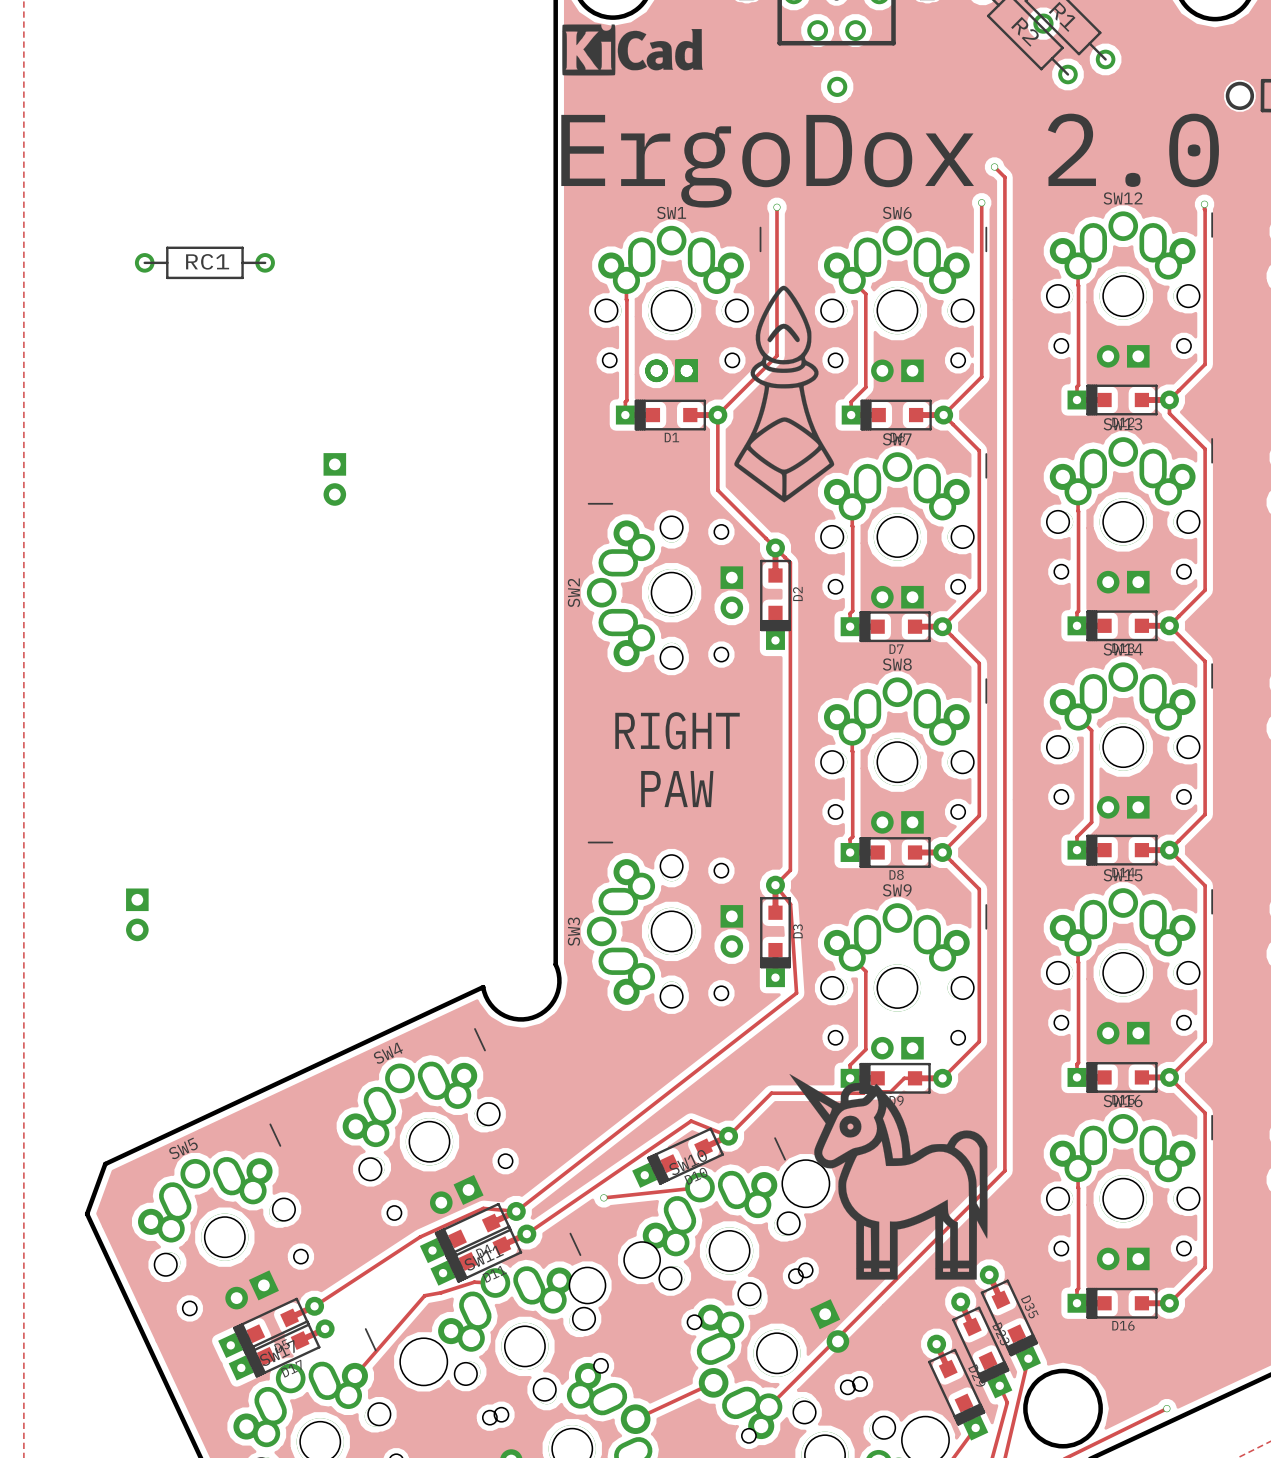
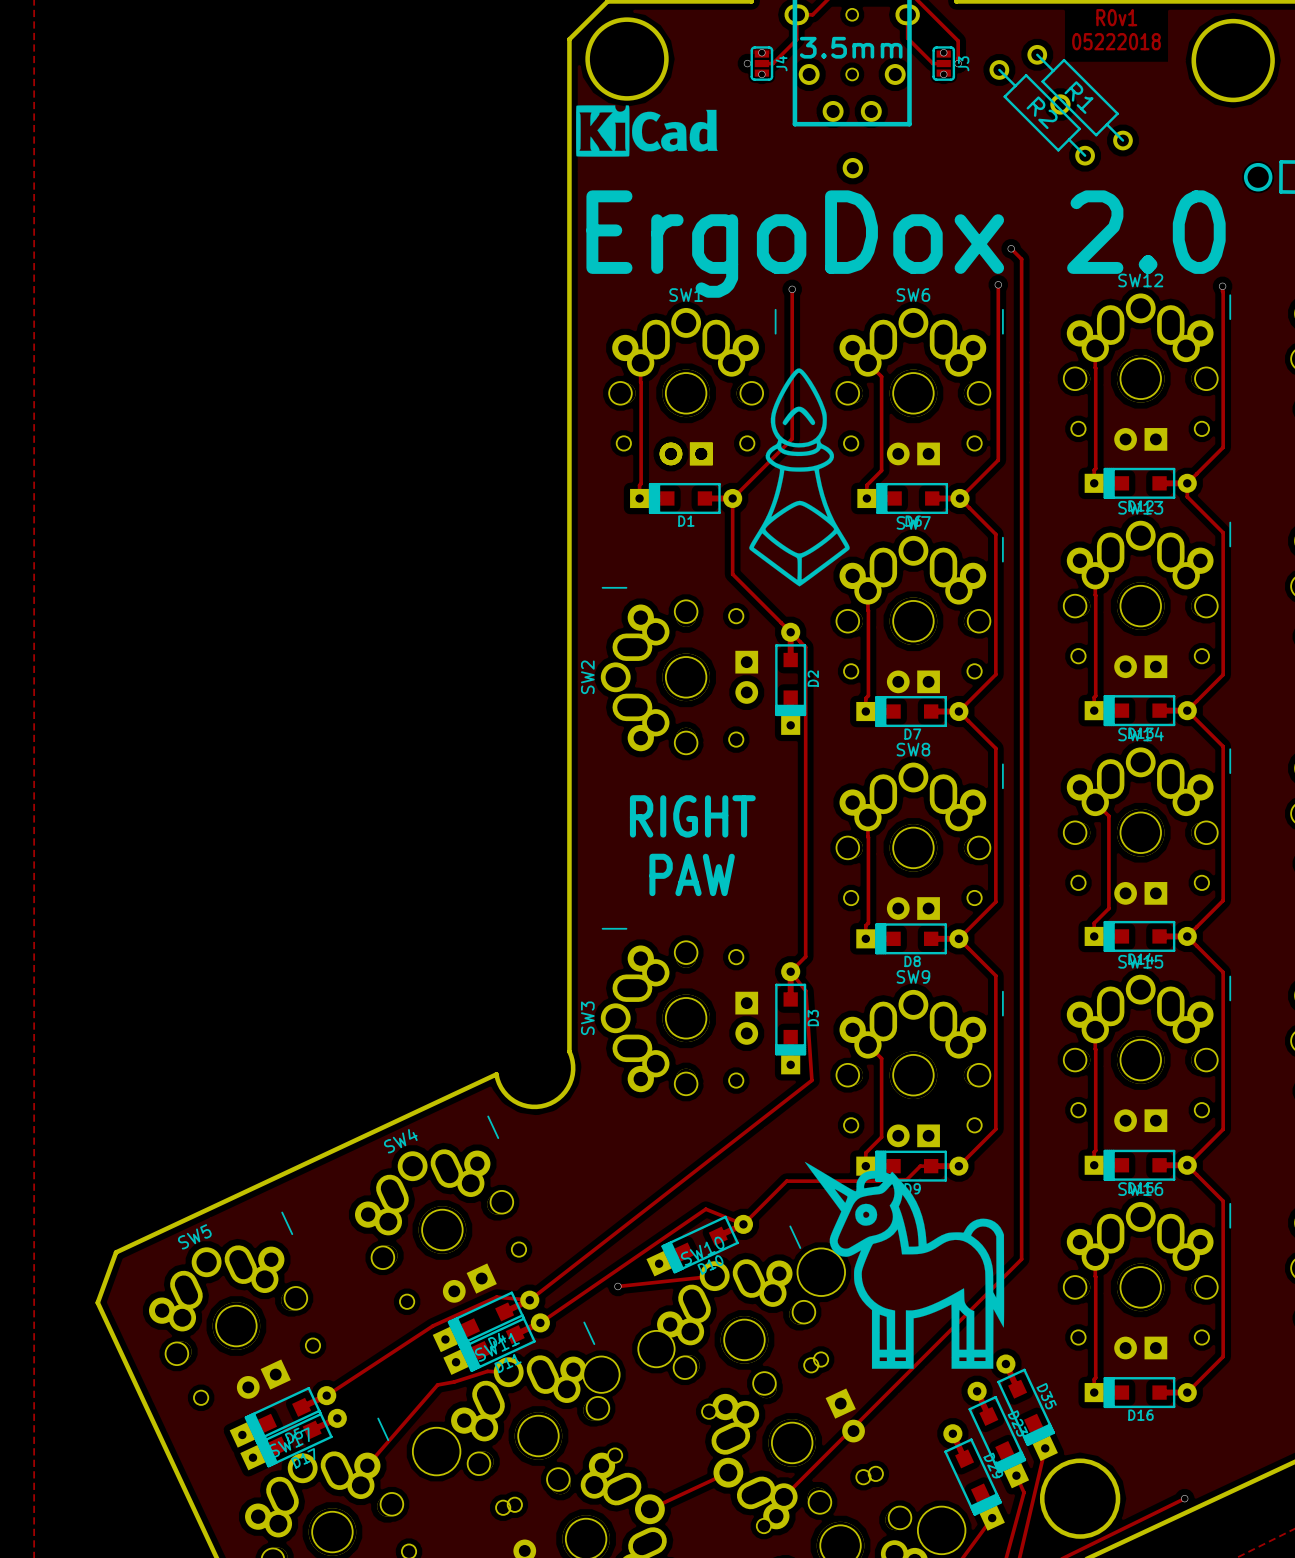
RC1: (204, 262) -> none
part: (334, 479) -> none
part: (137, 914) -> none

